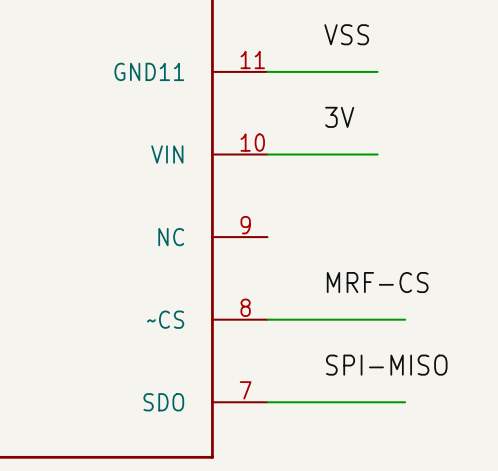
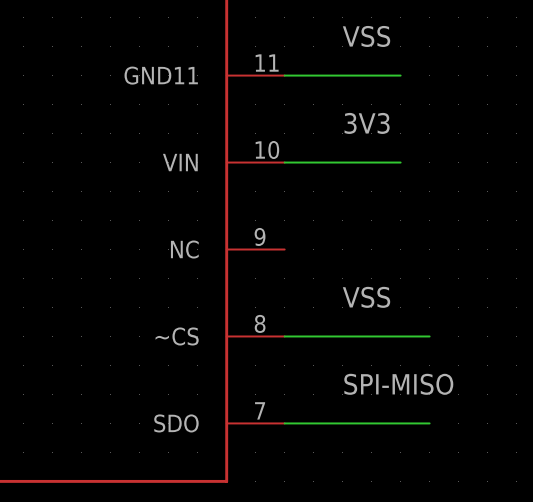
label: 3V (339, 117) -> 3V3 (367, 123)
label: MRF-CS (377, 282) -> VSS (366, 297)

